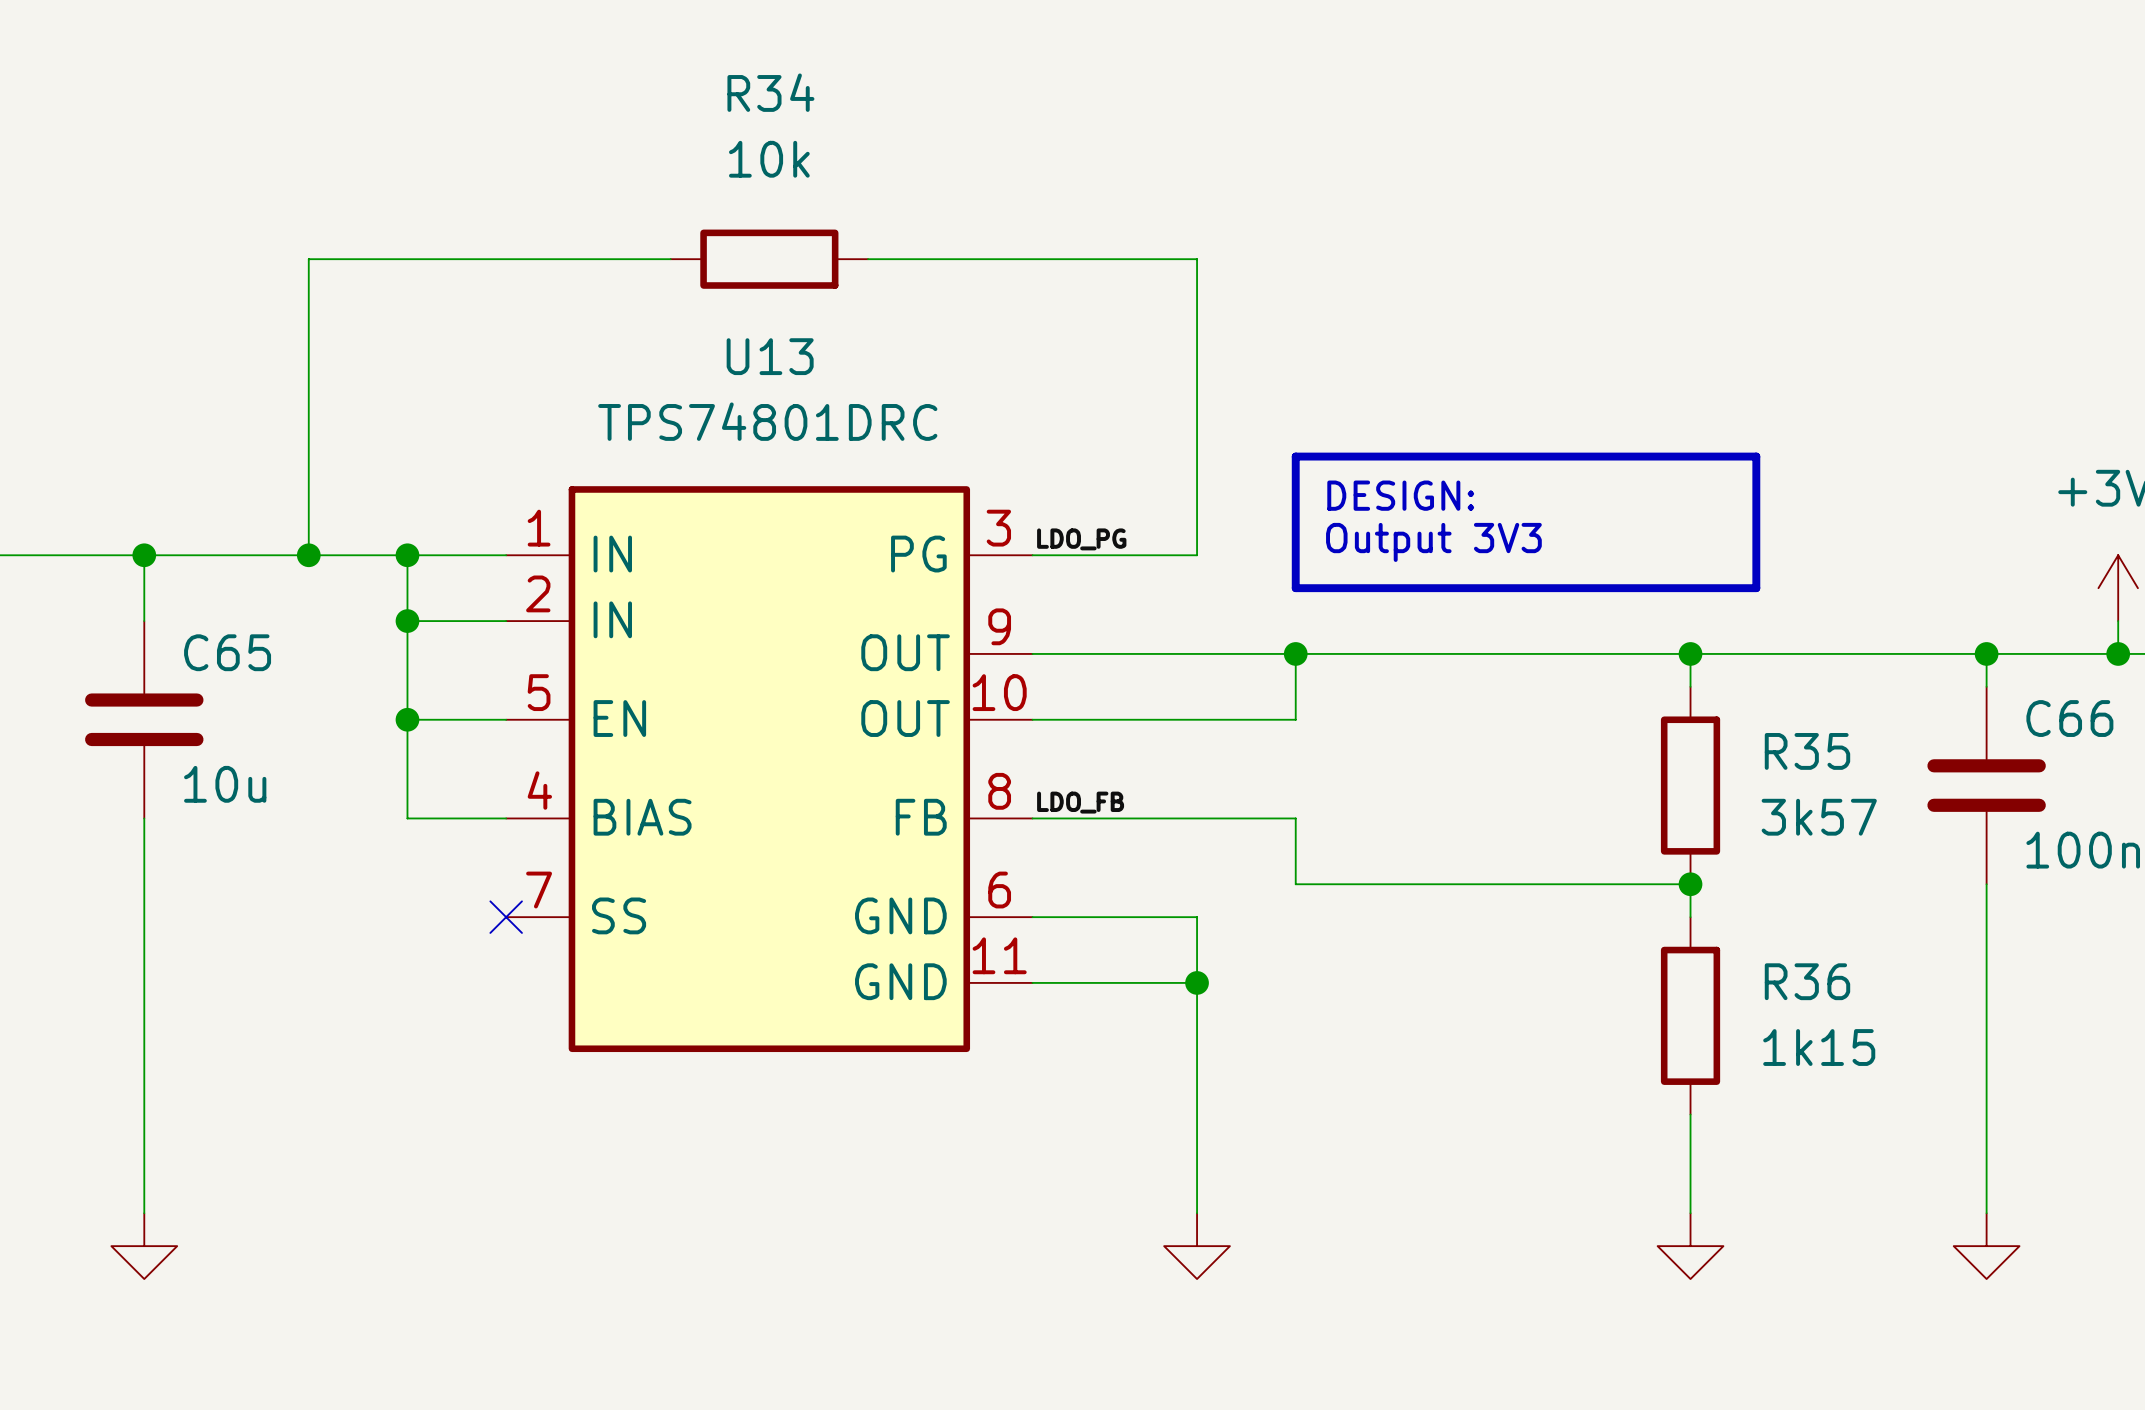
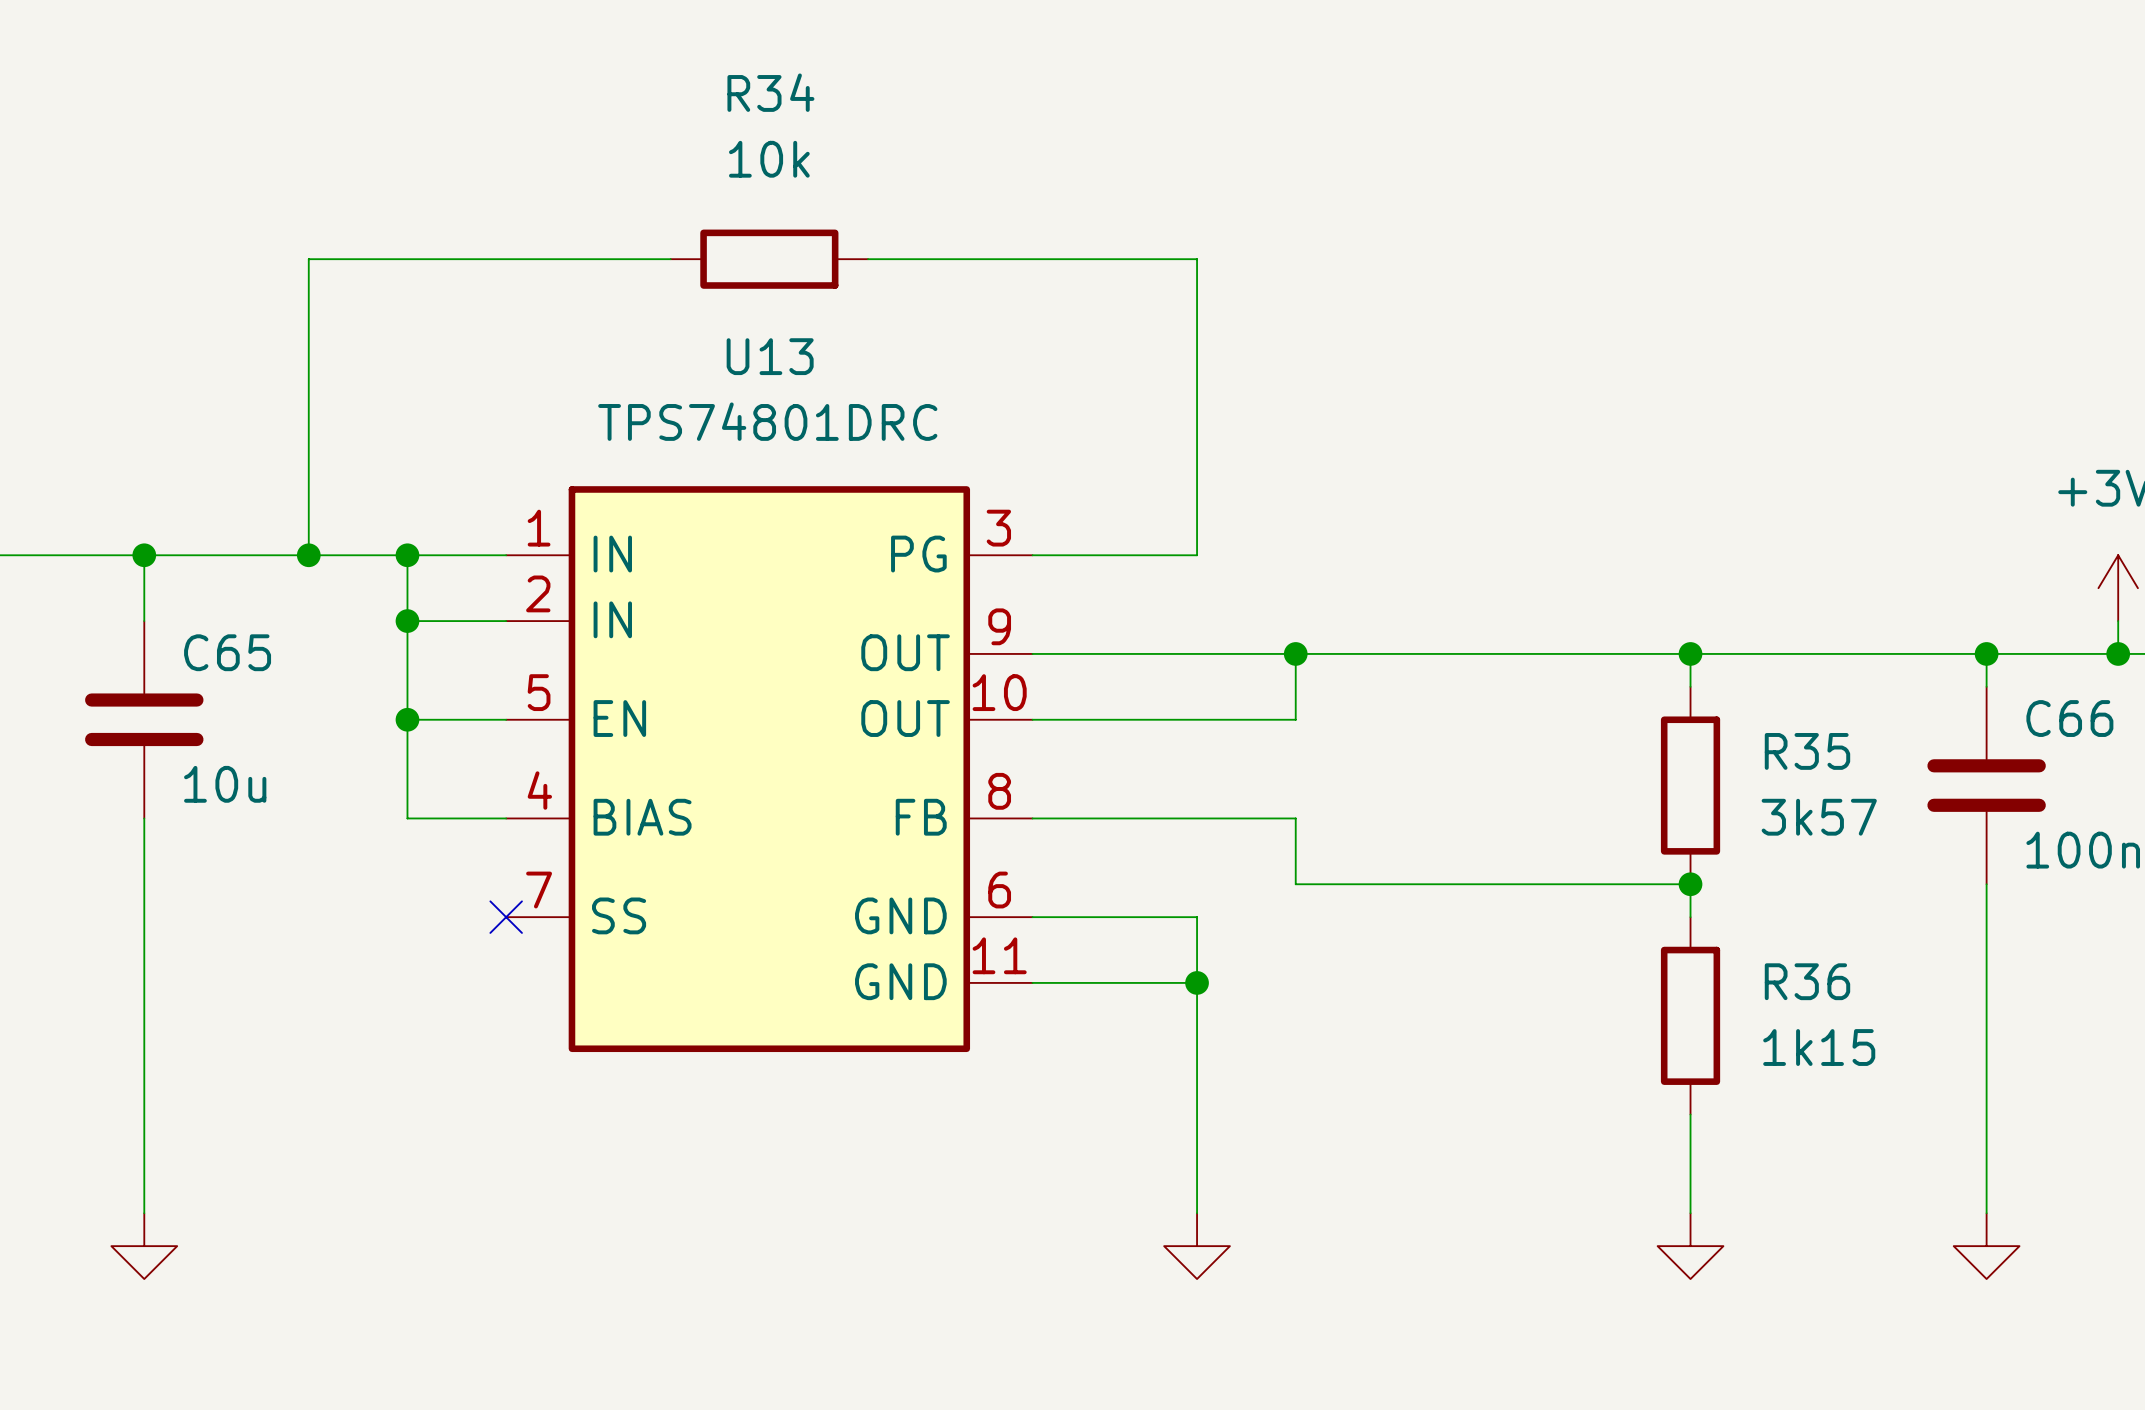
line: (1295, 456) (1756, 456) (1756, 588) (1295, 588) (1295, 456) -> none
text: DESIGN: (1400, 495) -> none
label: LDO_PG (1081, 539) -> none
text: Output 3V3 (1433, 542) -> none
label: LDO_FB (1080, 802) -> none

